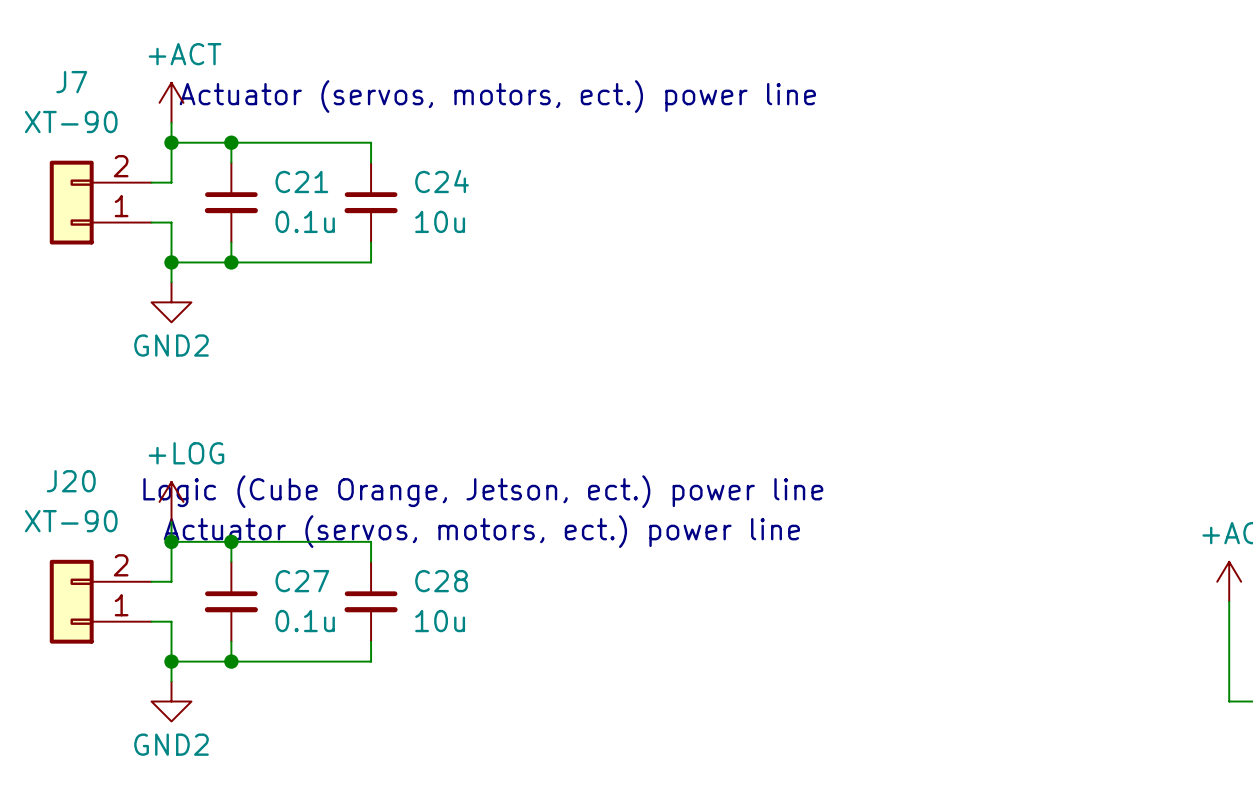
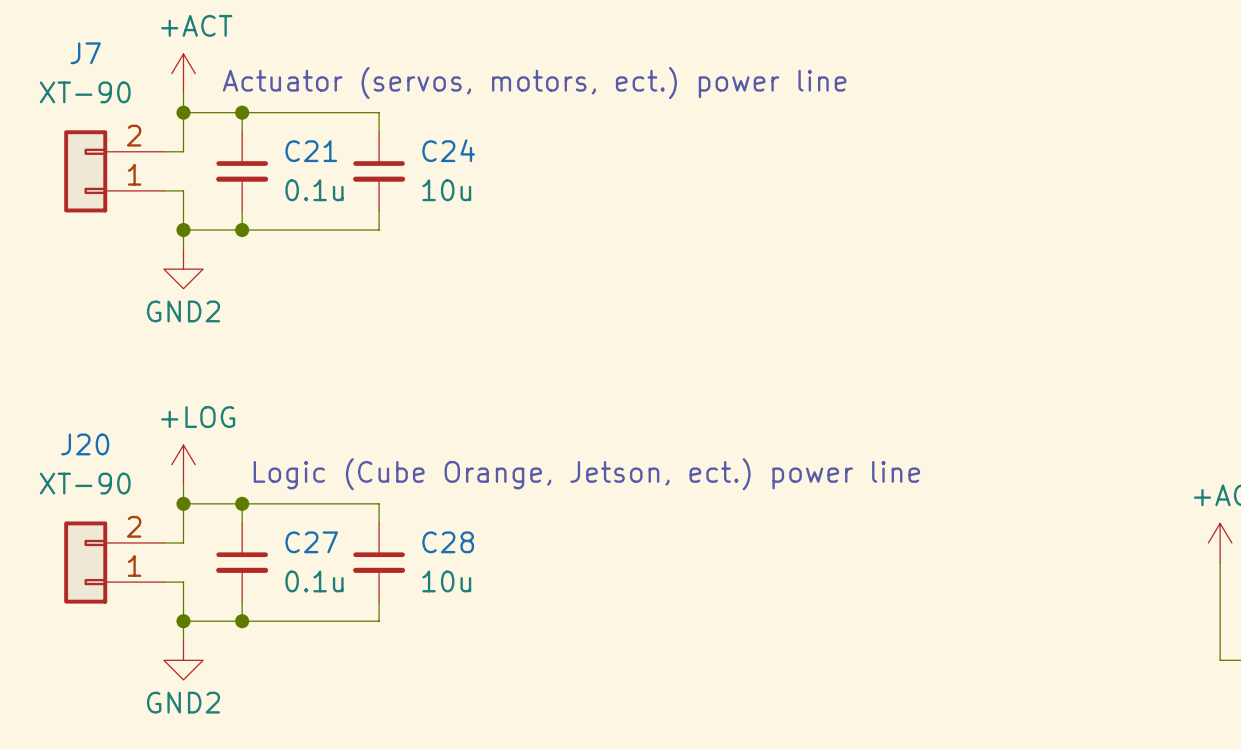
text position: Actuator (servos, motors, ect.) power line (497, 96) -> Actuator (servos, motors, ect.) power line (534, 83)
text position: Logic (Cube Orange, Jetson, ect.) power line (483, 491) -> Logic (Cube Orange, Jetson, ect.) power line (586, 474)
text: Actuator (servos, motors, ect.) power line (481, 531) -> none

